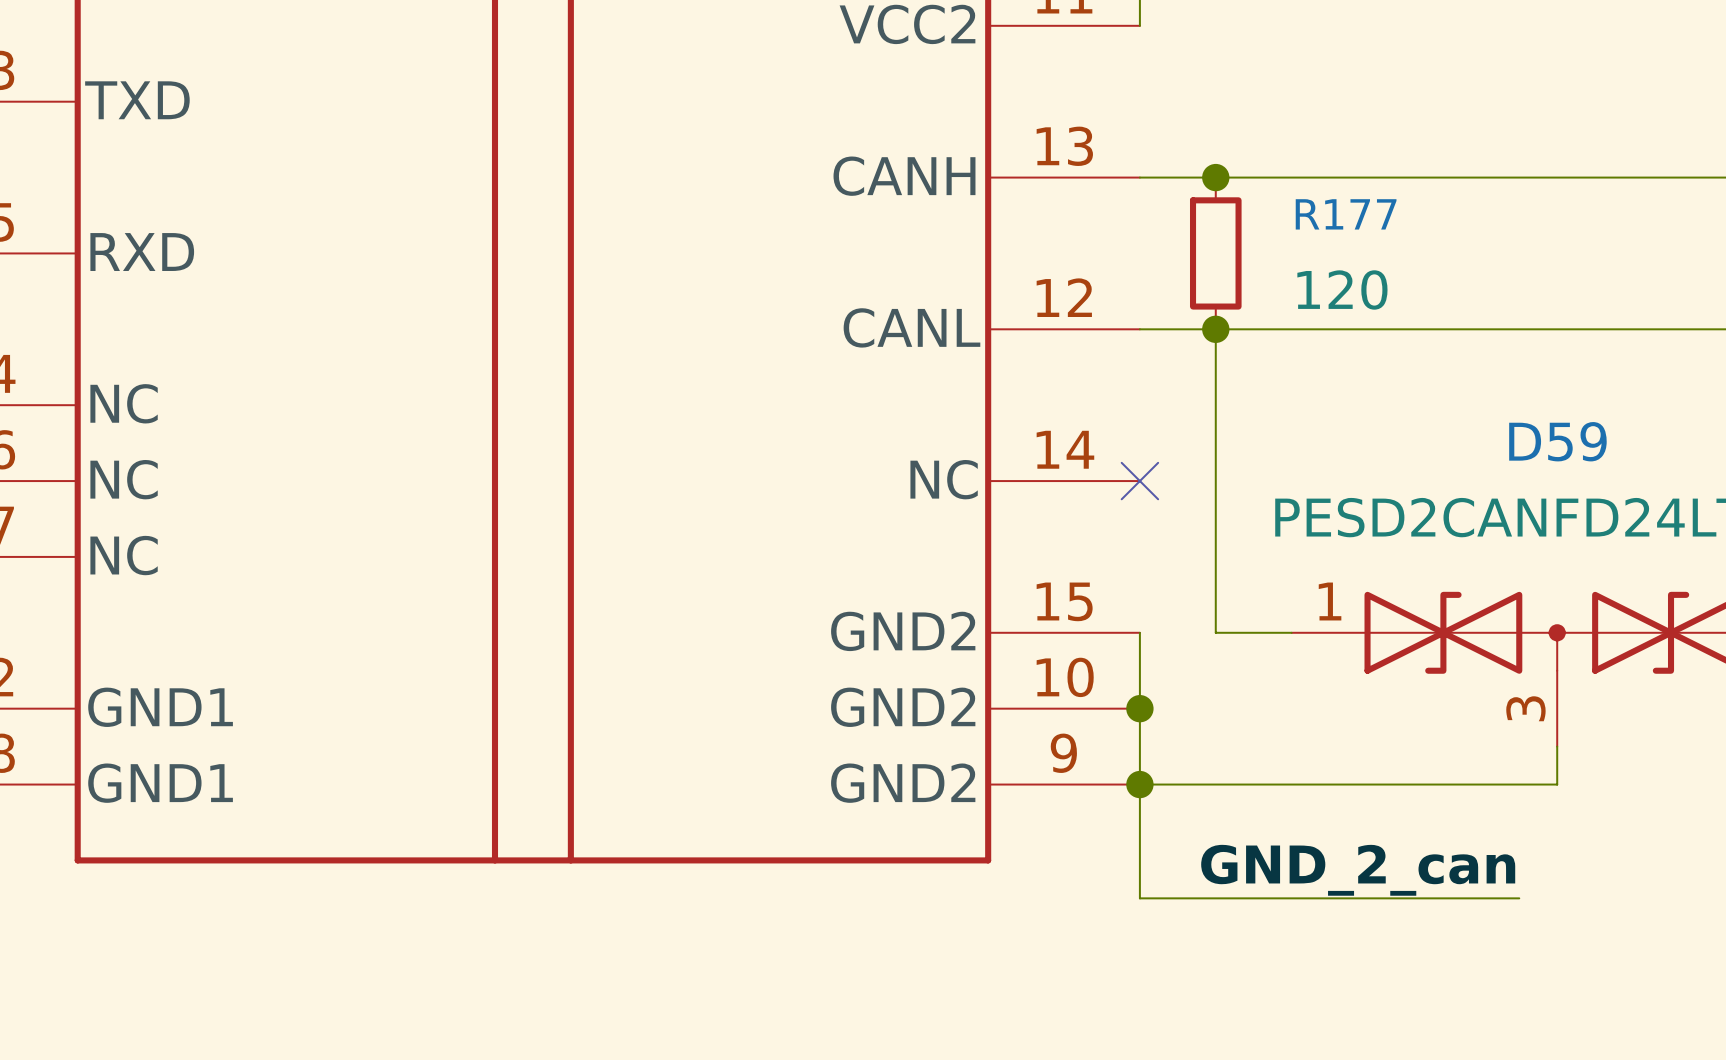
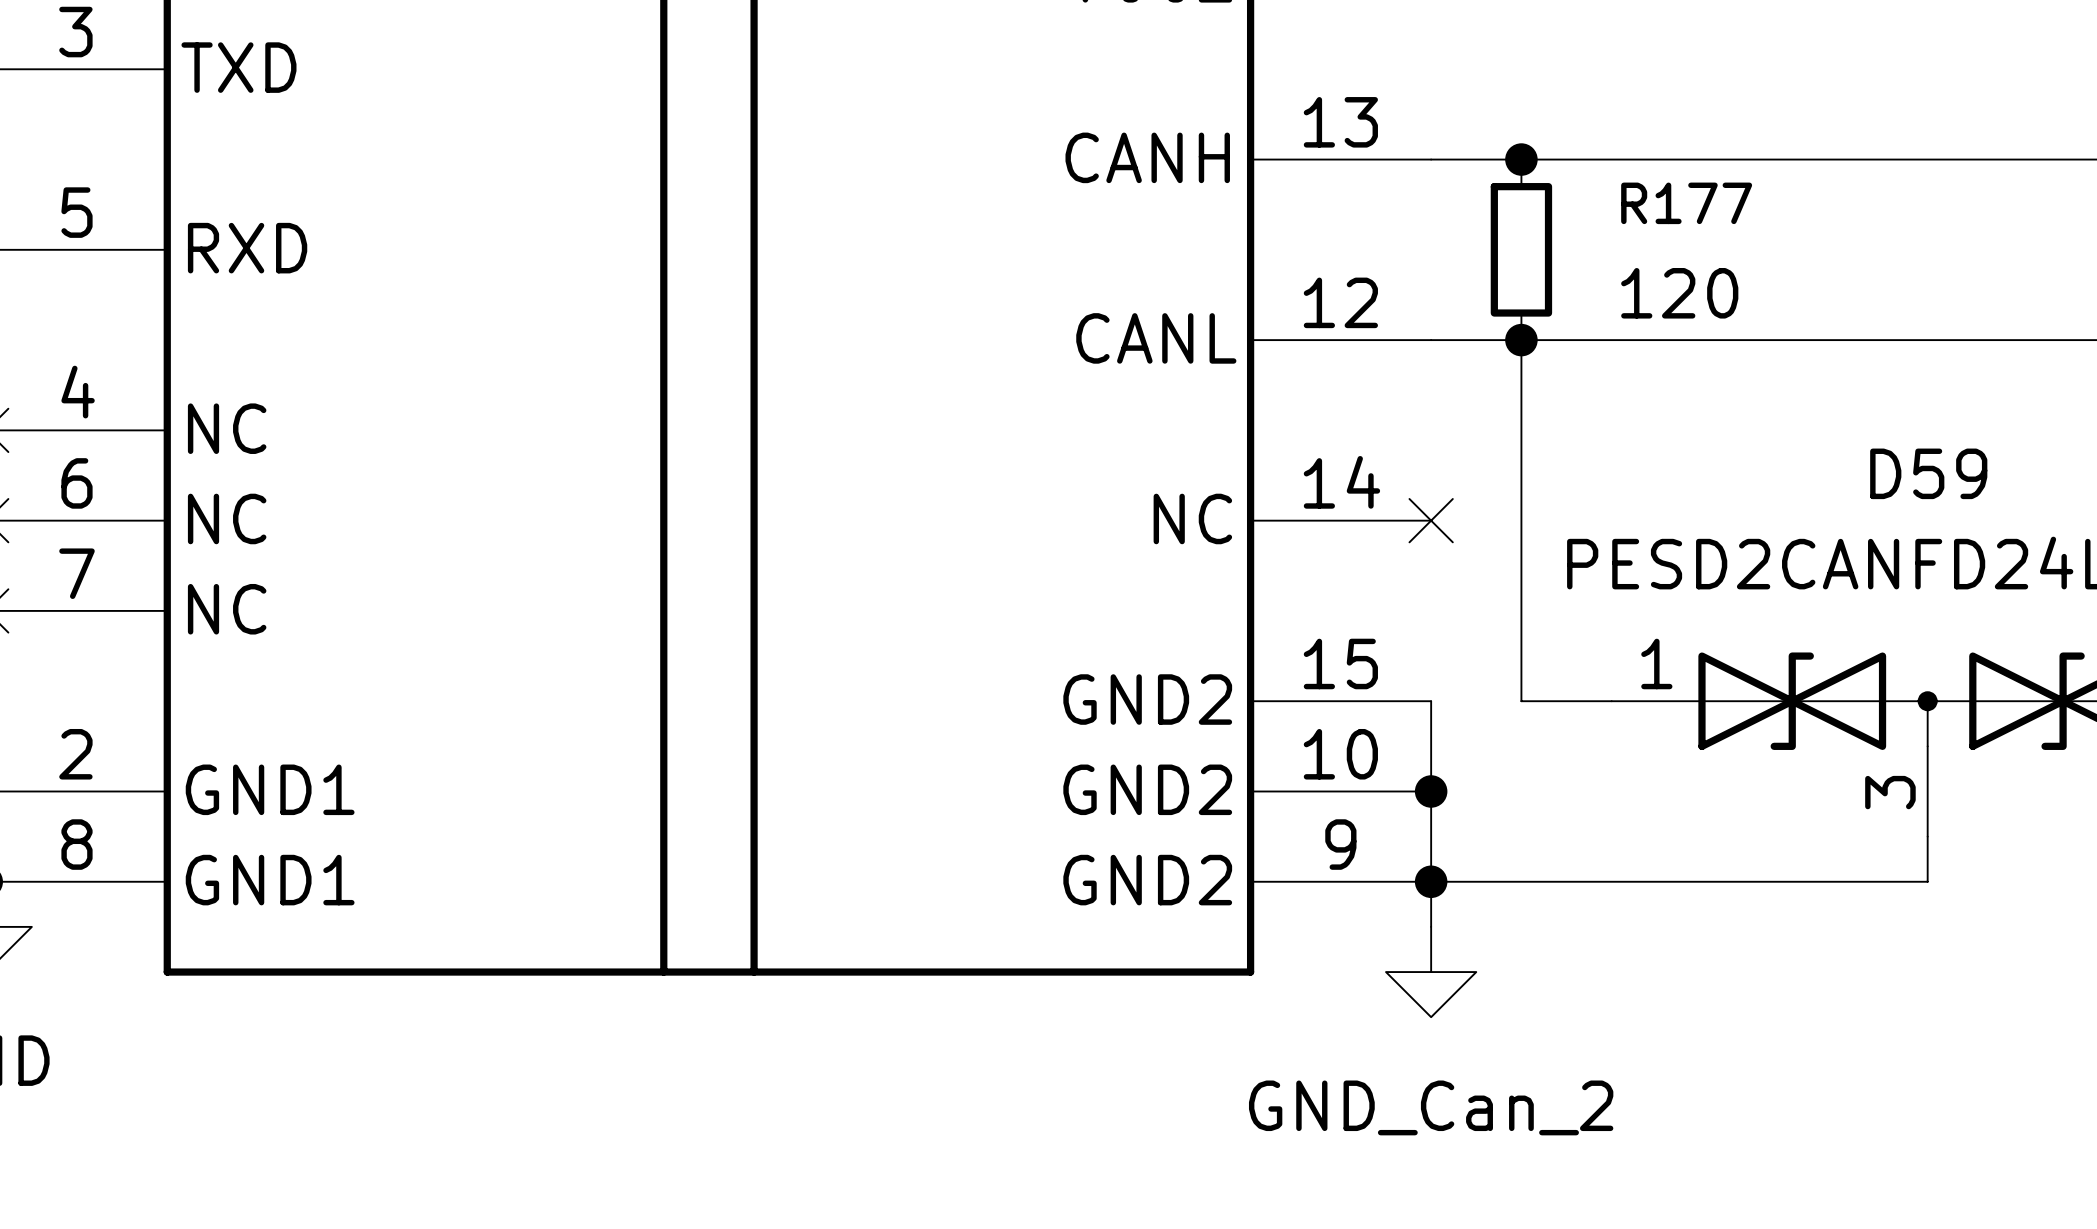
wire: (1139, 822) (1139, 898) (1519, 898) -> none
power symbol: none -> GND_Can_2 (1431, 972)
label: GND_2_can (1358, 870) -> none

